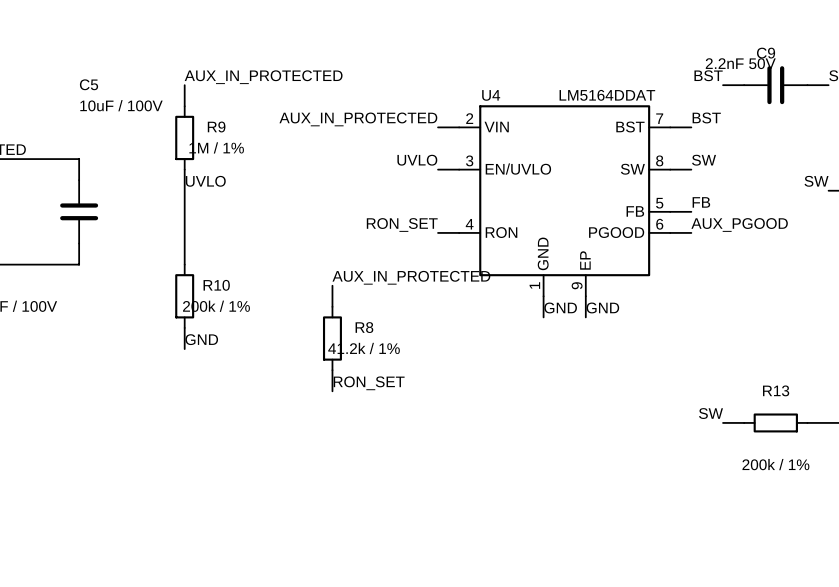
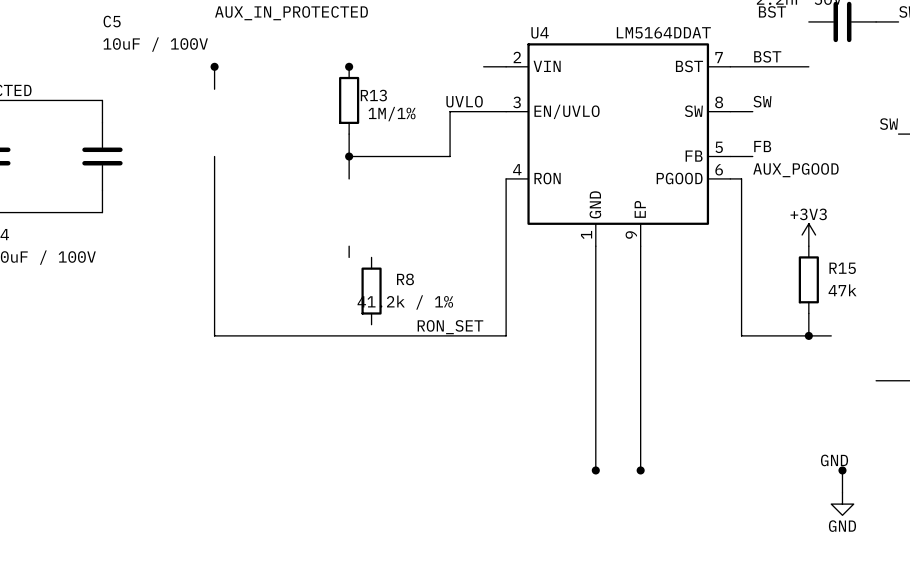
wire: (184, 85) (184, 106) -> (214, 66) (214, 89)
wire: (723, 85) (744, 85) -> none
label: AUX_IN_PROTECTED (358, 119) -> none
junction: none -> (214, 66)
junction: none -> (349, 66)
wire: none -> (752, 66) (808, 66)
R9: 1M / 1% (184, 137) -> none
wire: (184, 169) (184, 211) -> (349, 134) (349, 178)
wire: none -> (483, 111) (450, 111) (450, 156) (349, 156)
label: UVLO (205, 181) -> none
junction: none -> (349, 156)
label: RON_SET (402, 224) -> none
wire: (438, 232) (459, 232) -> (214, 302) (214, 335) (506, 335) (506, 178)
wire: (680, 232) (691, 232) -> (741, 178) (741, 335) (831, 335)
wire: none -> (214, 212) (214, 279)
label: AUX_IN_PROTECTED (411, 277) -> none
wire: (332, 285) (332, 306) -> none
power symbol: none -> +3V3 (808, 234)
R10: 200k / 1% (184, 296) -> none
wire: none -> (349, 246) (349, 257)
label: GND (560, 307) -> none
label: GND (602, 307) -> none
wire: none -> (595, 268) (595, 470)
wire: none -> (640, 268) (640, 470)
R15: none -> 47k (808, 279)
label: GND (201, 339) -> none
wire: none -> (808, 313) (808, 335)
wire: (332, 370) (332, 391) -> none
junction: none -> (808, 335)
label position: RON_SET (369, 383) -> RON_SET (450, 327)
label: SW (710, 413) -> none
wire: (723, 422) (744, 422) -> none
R13 rotation: 0° (775, 422) -> 90° clockwise (349, 100)
R13 position: (775, 422) -> (349, 100)
R13 value: 200k / 1% (775, 464) -> 1M/1% (392, 114)
label: none -> GND (834, 460)
junction: none -> (595, 470)
junction: none -> (640, 470)
wire: none -> (842, 470) (842, 492)
junction: none -> (842, 470)
power symbol: none -> GND (842, 504)

